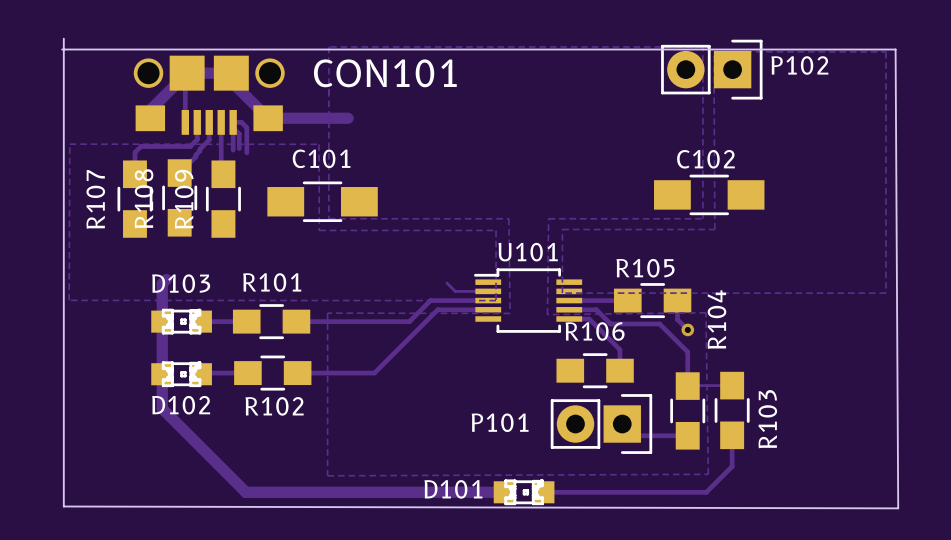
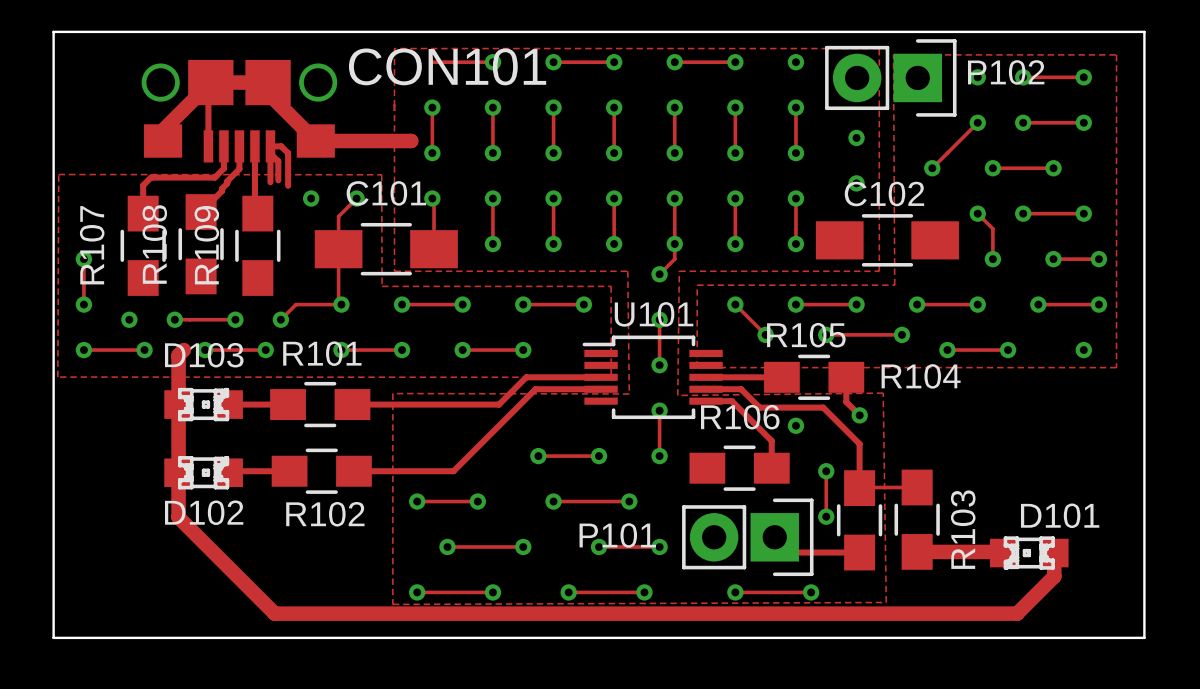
board edge: none -> (53, 31) (1144, 31) (1144, 637) (53, 637) (53, 31)
board edge: (63, 38) (63, 506) (898, 508) (895, 49) (62, 49) -> none
track: none -> (432, 62) (492, 62)
via: none -> (492, 62)
track: none -> (553, 62) (614, 62)
via: none -> (553, 62)
via: none -> (614, 62)
track: none -> (674, 62) (735, 62)
via: none -> (674, 62)
via: none -> (735, 62)
via: none -> (795, 62)
via: none -> (977, 77)
track: none -> (1023, 77) (1083, 77)
via: none -> (1023, 77)
via: none -> (1083, 77)
CON101 name position: CON101 (385, 73) -> CON101 (447, 66)
track: none -> (432, 107) (432, 153)
via: none -> (432, 107)
track: none -> (492, 107) (492, 153)
via: none -> (492, 107)
track: none -> (553, 107) (553, 153)
via: none -> (553, 107)
track: none -> (614, 107) (614, 153)
via: none -> (614, 107)
track: none -> (674, 107) (674, 153)
via: none -> (674, 107)
track: none -> (735, 107) (735, 153)
via: none -> (735, 107)
track: none -> (795, 107) (795, 153)
via: none -> (795, 107)
track: none -> (977, 122) (932, 168)
via: none -> (977, 122)
track: none -> (1023, 122) (1083, 122)
via: none -> (1023, 122)
via: none -> (1083, 122)
via: none -> (856, 137)
track: (341, 118) (348, 118) -> none
via: none -> (432, 153)
via: none -> (492, 153)
via: none -> (553, 153)
via: none -> (614, 153)
via: none -> (674, 153)
via: none -> (735, 153)
via: none -> (795, 153)
via: none -> (932, 168)
track: none -> (992, 168) (1053, 168)
via: none -> (992, 168)
via: none -> (1053, 168)
via: none -> (856, 183)
via: none -> (311, 198)
track: none -> (356, 198) (338, 216) (338, 301) (341, 304) (296, 304) (280, 319)
via: none -> (356, 198)
track: none -> (432, 198) (434, 200) (434, 249)
via: none -> (432, 198)
track: none -> (492, 198) (492, 243)
via: none -> (492, 198)
track: none -> (553, 198) (553, 243)
via: none -> (553, 198)
track: none -> (614, 198) (614, 243)
via: none -> (614, 198)
track: none -> (674, 198) (674, 259) (659, 274)
via: none -> (674, 198)
track: none -> (735, 198) (735, 243)
via: none -> (735, 198)
track: none -> (795, 198) (795, 243)
via: none -> (795, 198)
track: none -> (977, 213) (992, 228) (992, 259)
via: none -> (977, 213)
track: none -> (1023, 213) (1083, 213)
via: none -> (1023, 213)
via: none -> (1083, 213)
via: none -> (492, 243)
via: none -> (553, 243)
via: none -> (614, 243)
via: none -> (674, 243)
via: none -> (735, 243)
via: none -> (795, 243)
track: none -> (83, 259) (83, 304)
via: none -> (83, 259)
via: none -> (992, 259)
track: none -> (1053, 259) (1098, 259)
via: none -> (1053, 259)
via: none -> (1098, 259)
via: none -> (659, 274)
via: none -> (83, 304)
via: none -> (341, 304)
track: none -> (402, 304) (462, 304)
via: none -> (402, 304)
via: none -> (462, 304)
track: none -> (523, 304) (583, 304)
via: none -> (523, 304)
via: none -> (583, 304)
track: none -> (735, 304) (765, 334)
via: none -> (735, 304)
track: none -> (795, 304) (856, 304)
via: none -> (795, 304)
via: none -> (856, 304)
track: none -> (917, 304) (977, 304)
via: none -> (917, 304)
via: none -> (977, 304)
track: none -> (1038, 304) (1098, 304)
via: none -> (1038, 304)
via: none -> (1098, 304)
via: none -> (129, 319)
track: none -> (174, 319) (235, 319)
via: none -> (174, 319)
via: none -> (235, 319)
via: none -> (280, 319)
track: none -> (659, 319) (659, 365)
via: none -> (659, 319)
via: none -> (765, 334)
track: none -> (826, 334) (902, 334)
via: none -> (826, 334)
via: none -> (902, 334)
track: none -> (83, 350) (144, 350)
via: none -> (83, 350)
via: none -> (144, 350)
track: none -> (205, 350) (265, 350)
via: none -> (205, 350)
via: none -> (265, 350)
track: none -> (341, 350) (402, 350)
via: none -> (341, 350)
via: none -> (402, 350)
track: none -> (462, 350) (523, 350)
via: none -> (462, 350)
via: none -> (523, 350)
track: none -> (947, 350) (1008, 350)
via: none -> (947, 350)
via: none -> (1008, 350)
via: none -> (1083, 350)
track: (446, 283) (455, 291) (488, 291) -> none
via: none -> (659, 365)
R104 name rotation: 0° (716, 319) -> 90° clockwise (921, 376)
track: none -> (659, 410) (659, 456)
via: none -> (659, 410)
via: none -> (795, 425)
track: none -> (538, 456) (599, 456)
via: none -> (538, 456)
via: none -> (599, 456)
via: none -> (659, 456)
track: none -> (826, 471) (826, 516)
via: none -> (826, 471)
track: none -> (417, 501) (477, 501)
via: none -> (417, 501)
via: none -> (477, 501)
track: none -> (553, 501) (629, 501)
via: none -> (553, 501)
via: none -> (629, 501)
via: none -> (826, 516)
track: none -> (447, 546) (523, 546)
via: none -> (447, 546)
via: none -> (523, 546)
track: none -> (599, 546) (659, 546)
via: none -> (599, 546)
via: none -> (659, 546)
track: (732, 435) (732, 466) (706, 492) (543, 492) -> (917, 551) (1004, 553)
track: none -> (417, 592) (492, 592)
via: none -> (417, 592)
via: none -> (492, 592)
track: none -> (568, 592) (644, 592)
via: none -> (568, 592)
via: none -> (644, 592)
track: none -> (735, 592) (811, 592)
via: none -> (735, 592)
via: none -> (811, 592)
track: (236, 482) (245, 492) (504, 492) -> (274, 613) (1017, 613) (1054, 576) (1054, 553)
D101 name position: D101 (453, 489) -> D101 (1060, 515)
D101 rotation: 0° (524, 492) -> 180° (1029, 553)
D101 position: (524, 492) -> (1029, 553)

